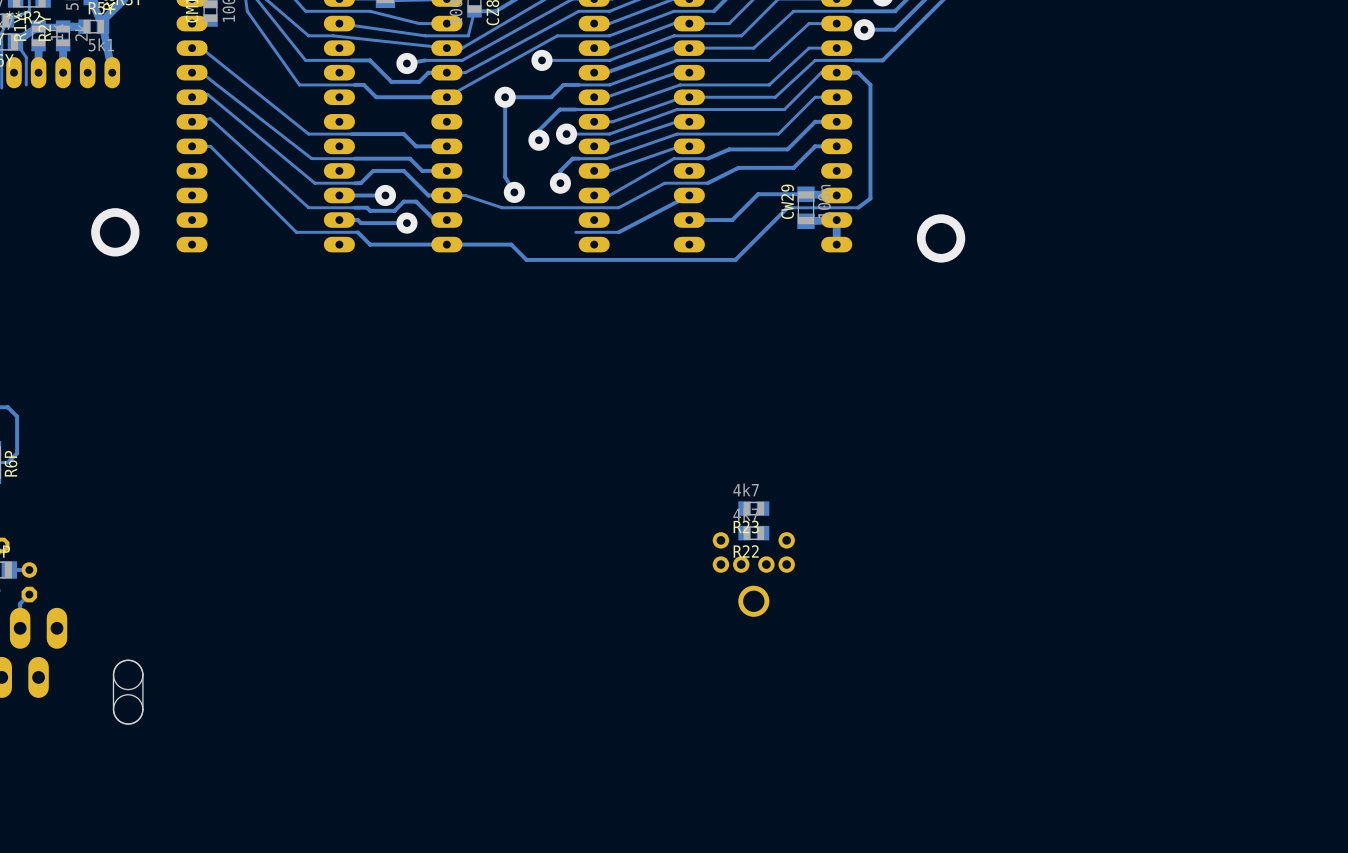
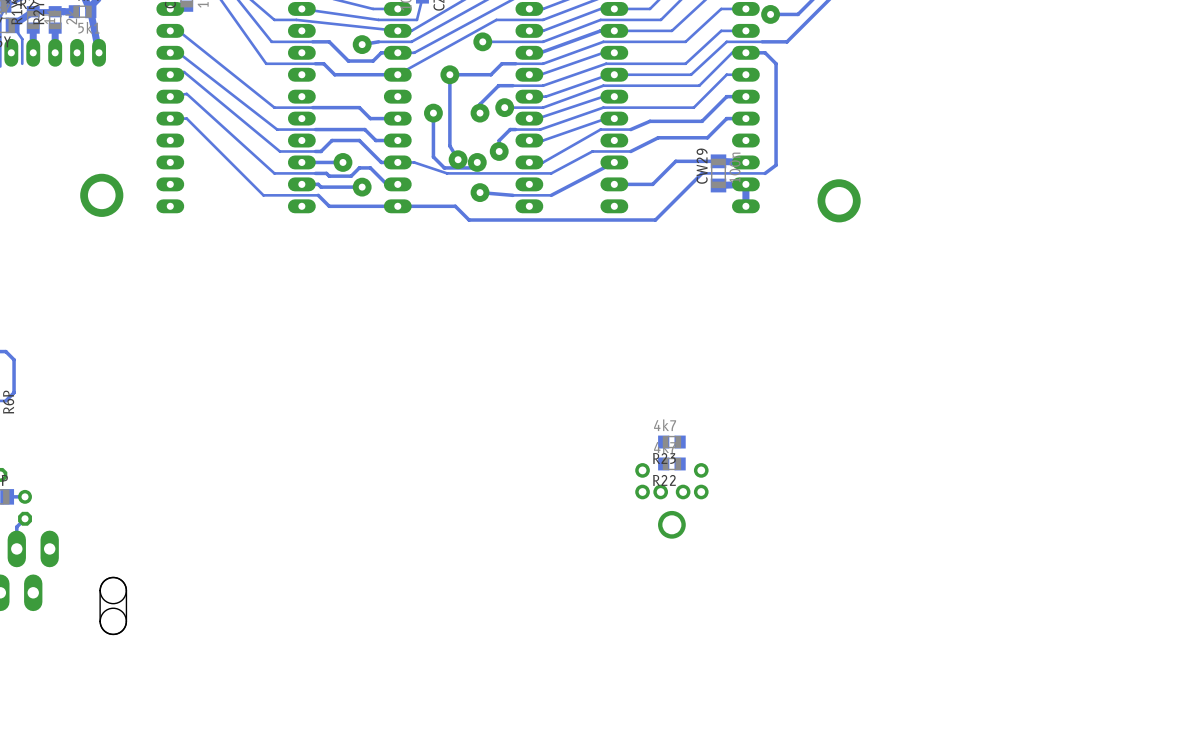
track: none -> (433, 113) (433, 156) (444, 167) (477, 167) (477, 162)
via: none -> (433, 113)
via: none -> (477, 162)
track: none -> (480, 192) (512, 195)
via: none -> (480, 192)

